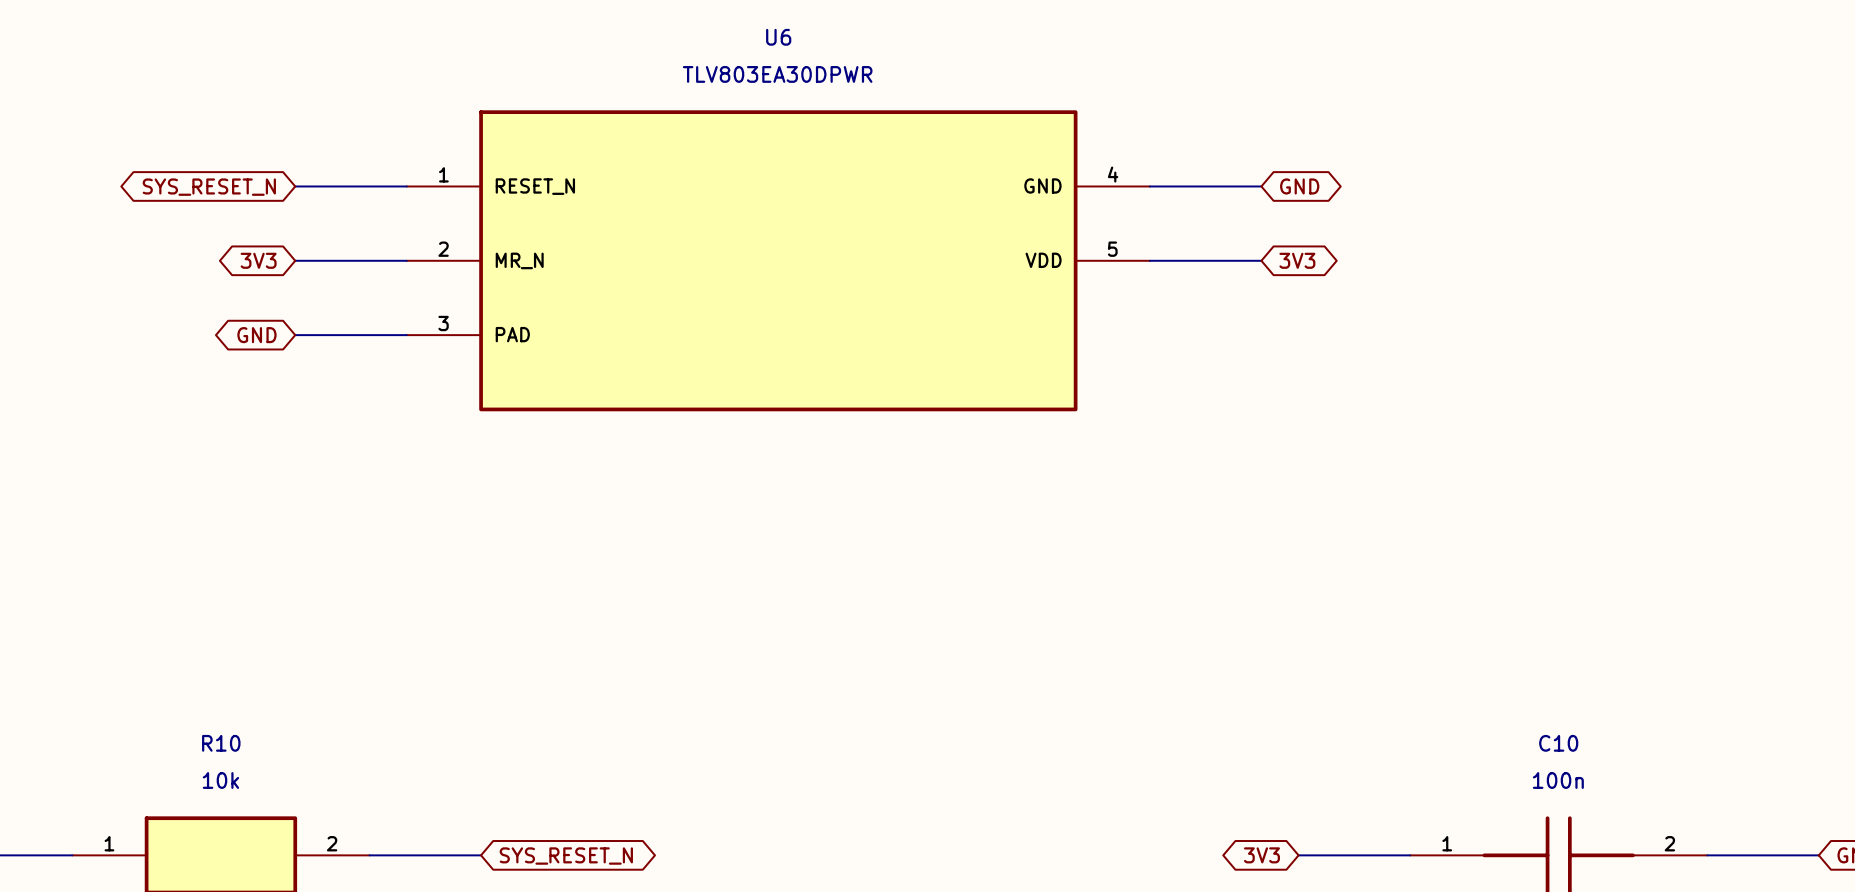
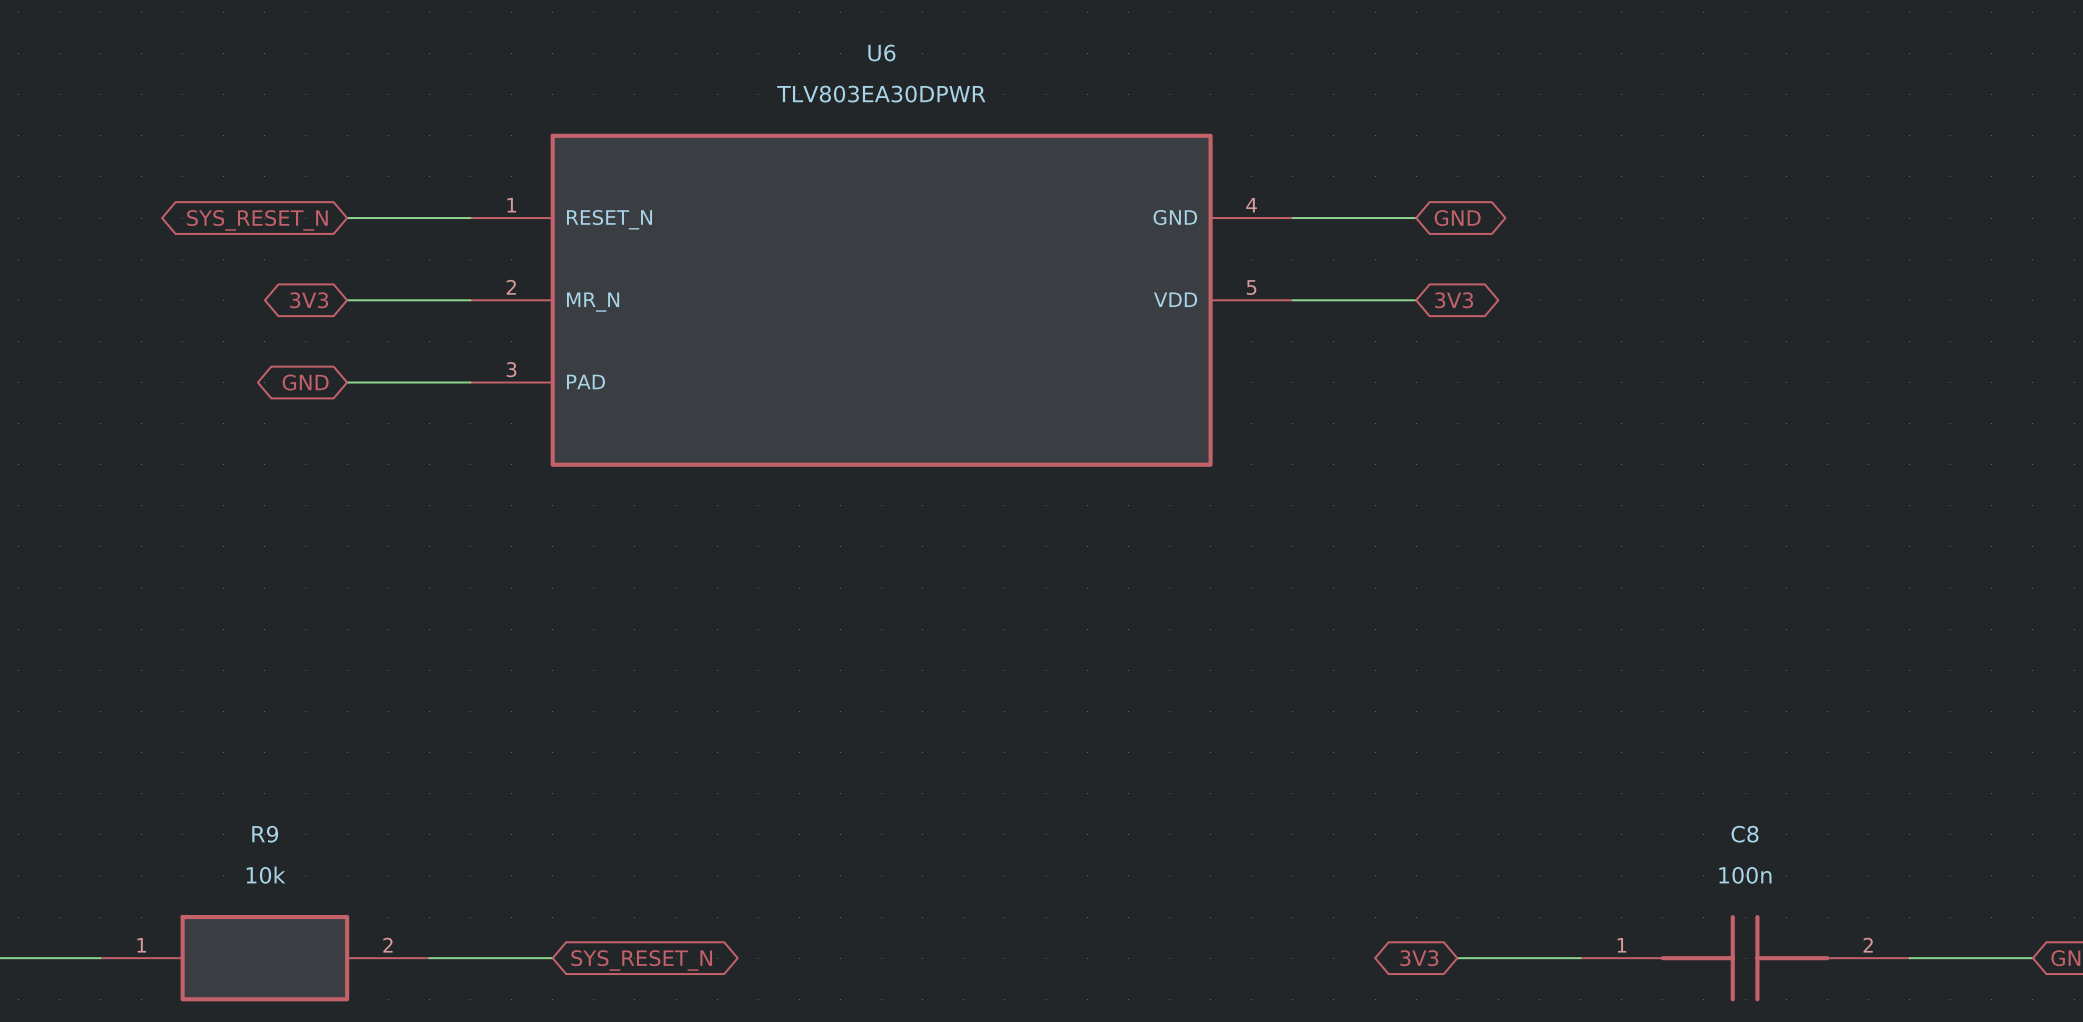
R10 name: R10 (221, 743) -> R9 (265, 834)
C10 name: C10 (1558, 743) -> C8 (1744, 834)

